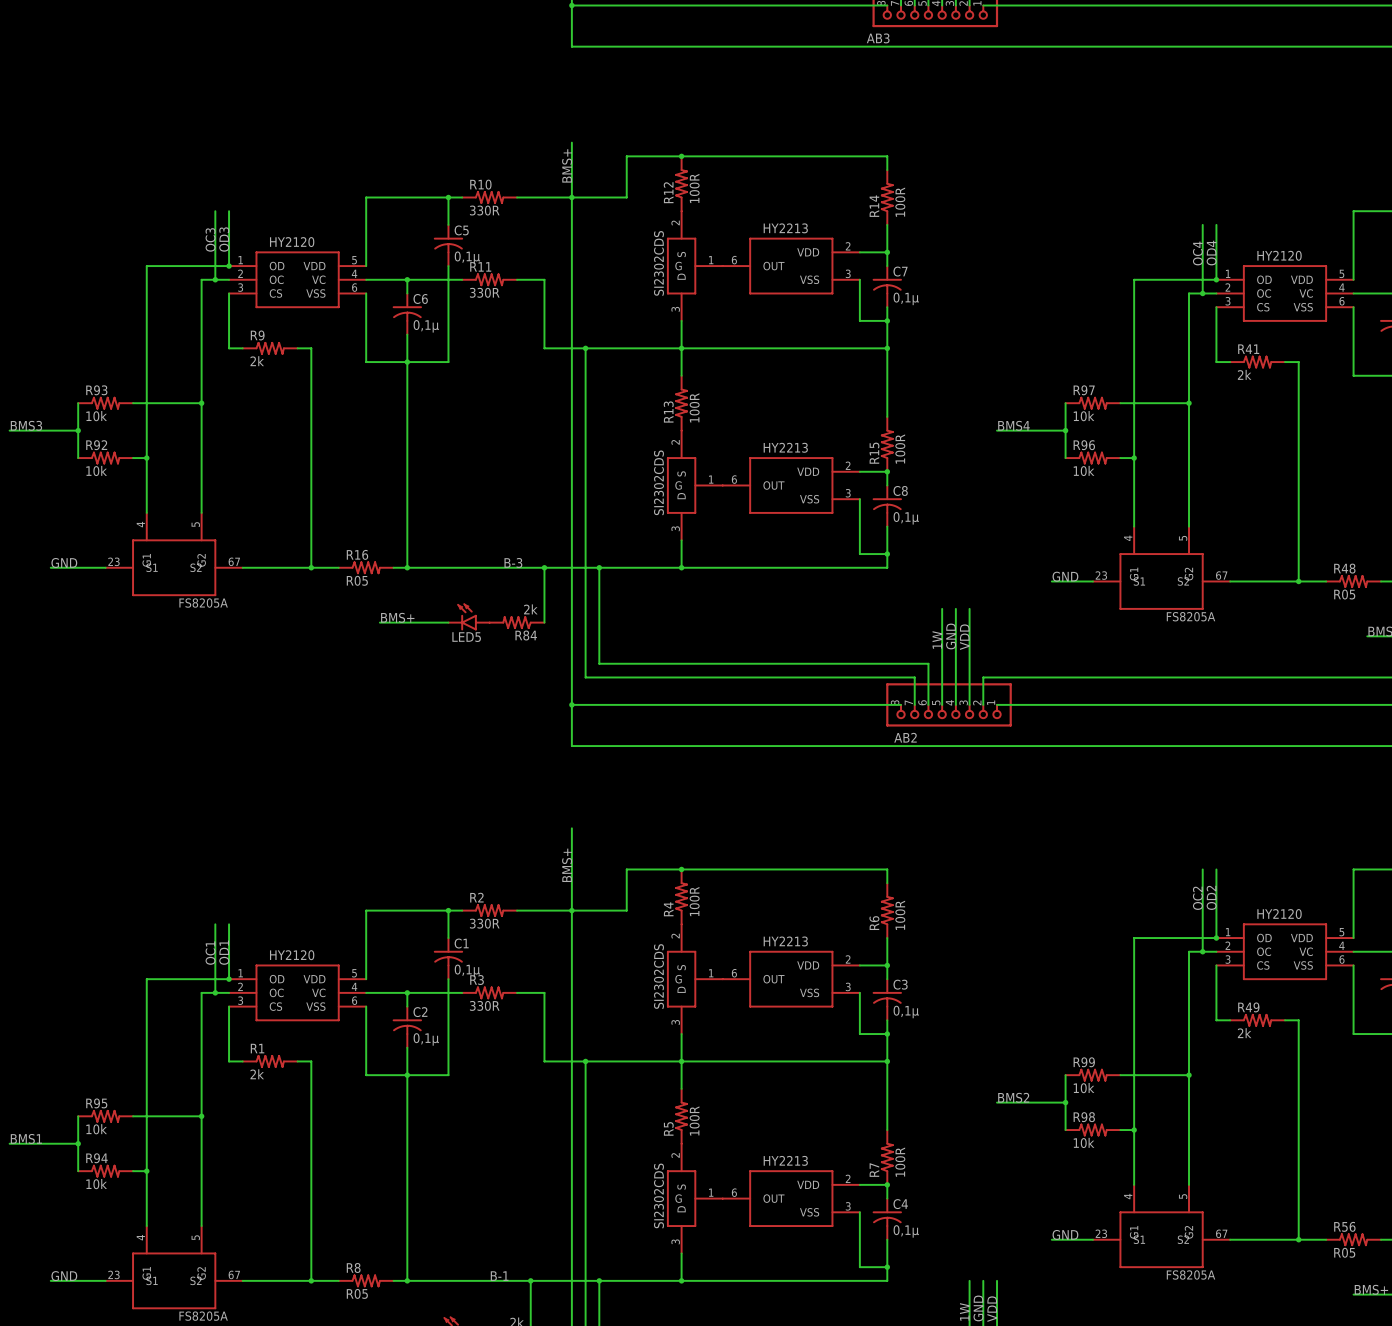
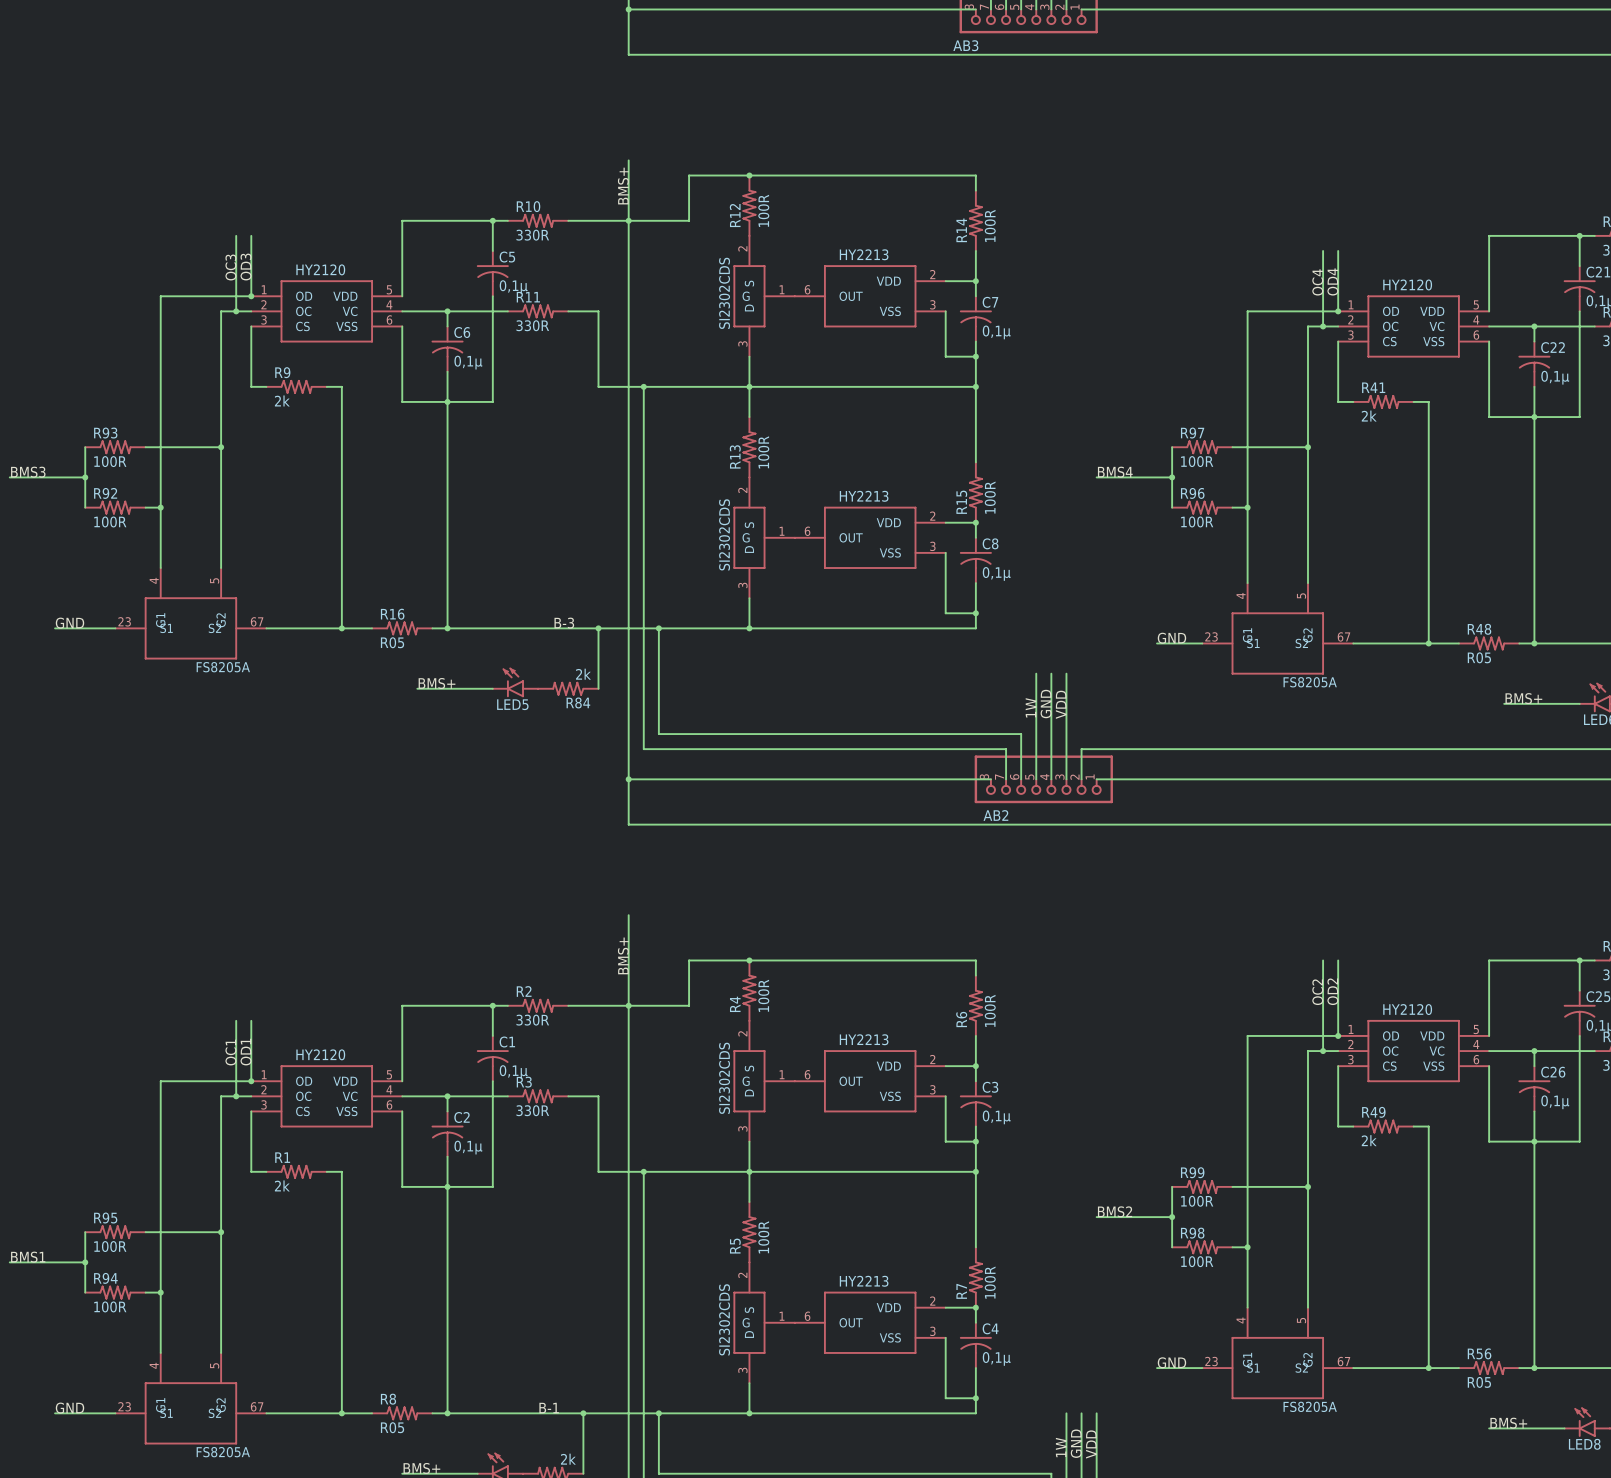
R93 value: 10k (96, 416) -> 100R (110, 461)
R97 value: 10k (1084, 416) -> 100R (1197, 461)
R92 value: 10k (96, 470) -> 100R (110, 521)
R96 value: 10k (1084, 470) -> 100R (1197, 521)
R99 value: 10k (1084, 1088) -> 100R (1197, 1201)
R95 value: 10k (96, 1129) -> 100R (110, 1246)
R98 value: 10k (1084, 1142) -> 100R (1197, 1261)
R94 value: 10k (96, 1184) -> 100R (110, 1306)

